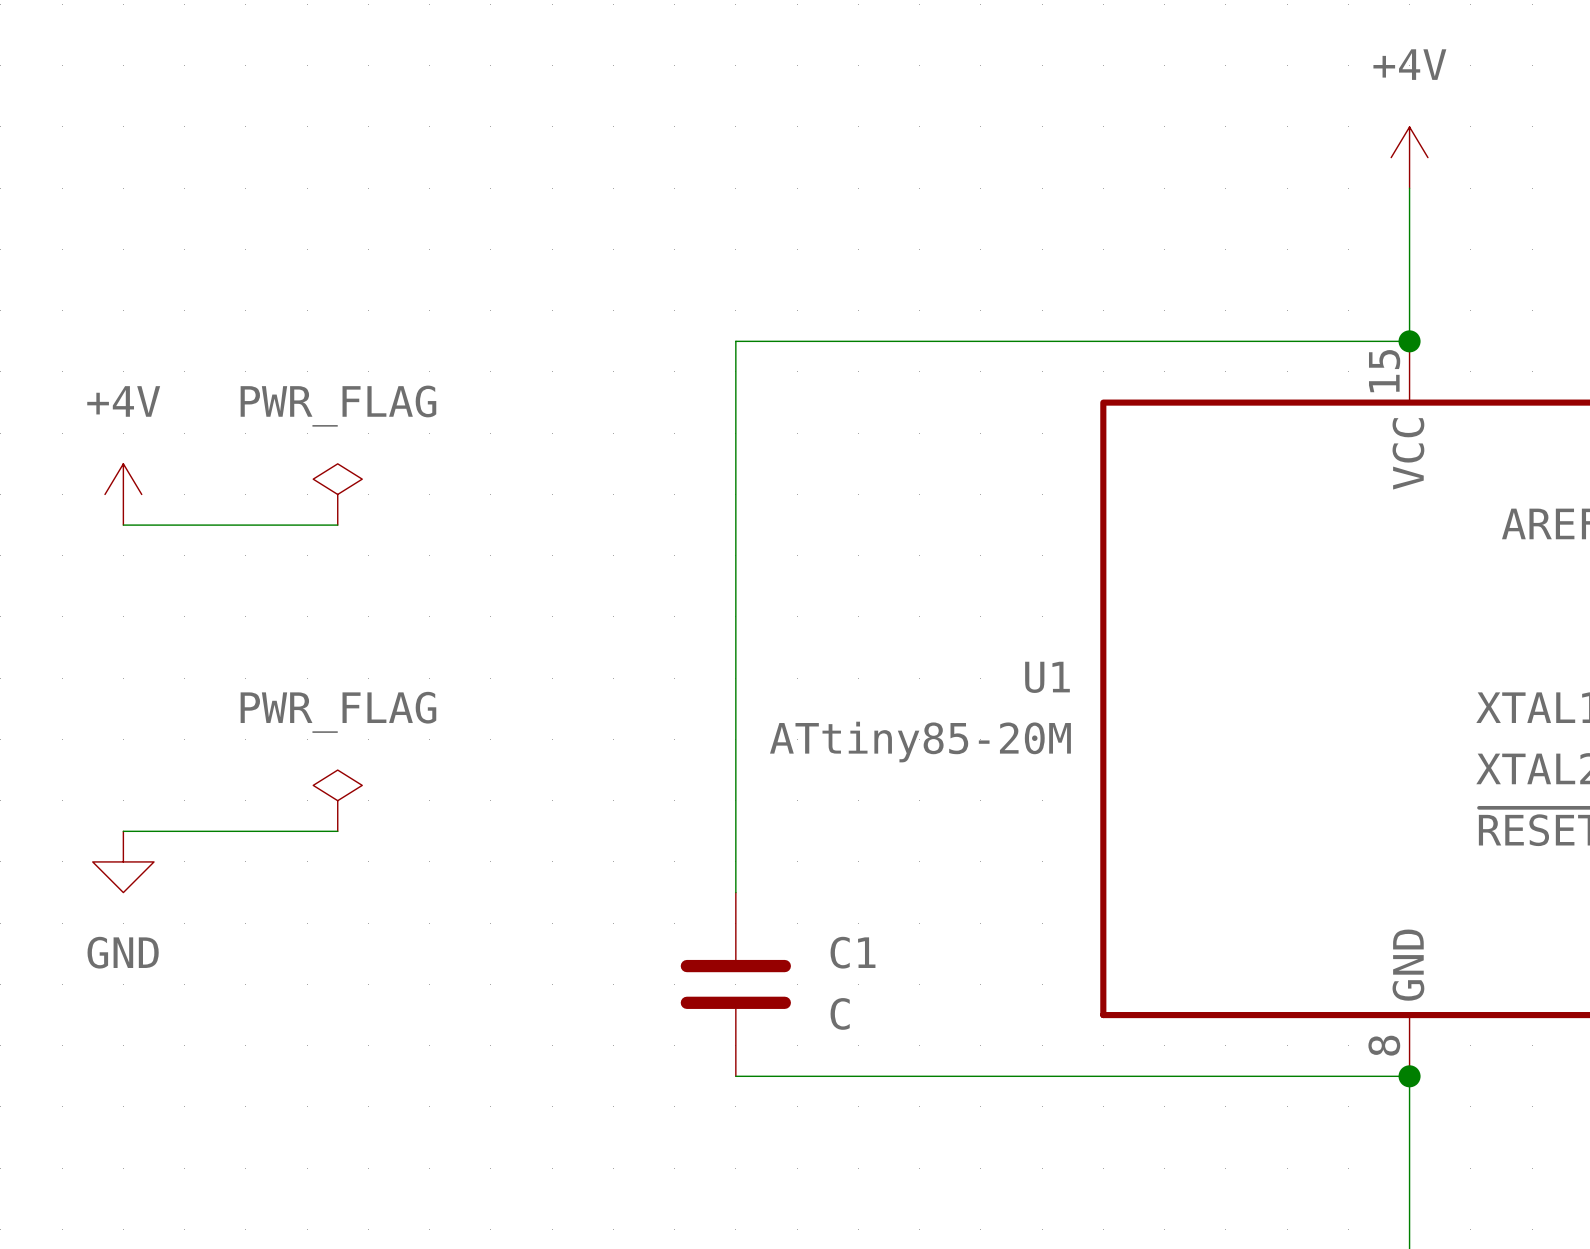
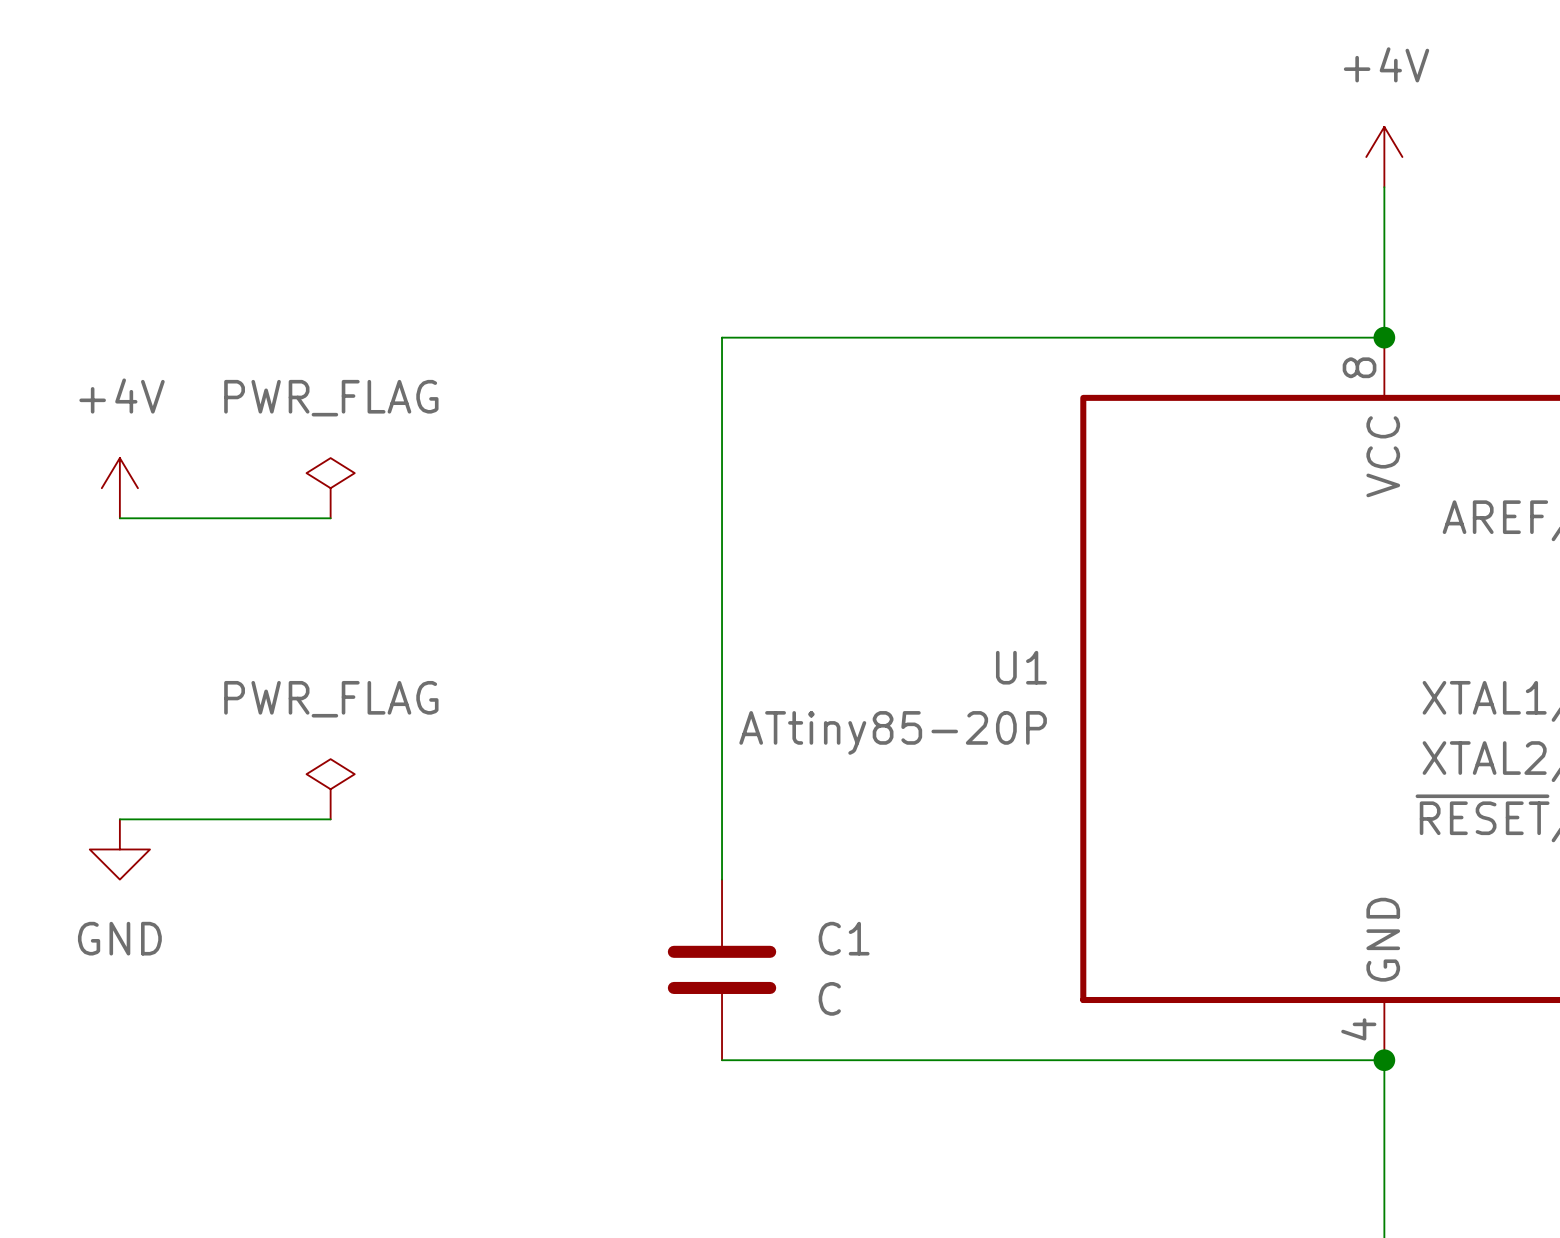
U1 pin number: 15 (1384, 371) -> 8 (1359, 367)
U1 value: ATtiny85-20M (920, 742) -> ATtiny85-20P (893, 732)
U1 pin number: 8 (1384, 1045) -> 4 (1358, 1029)

